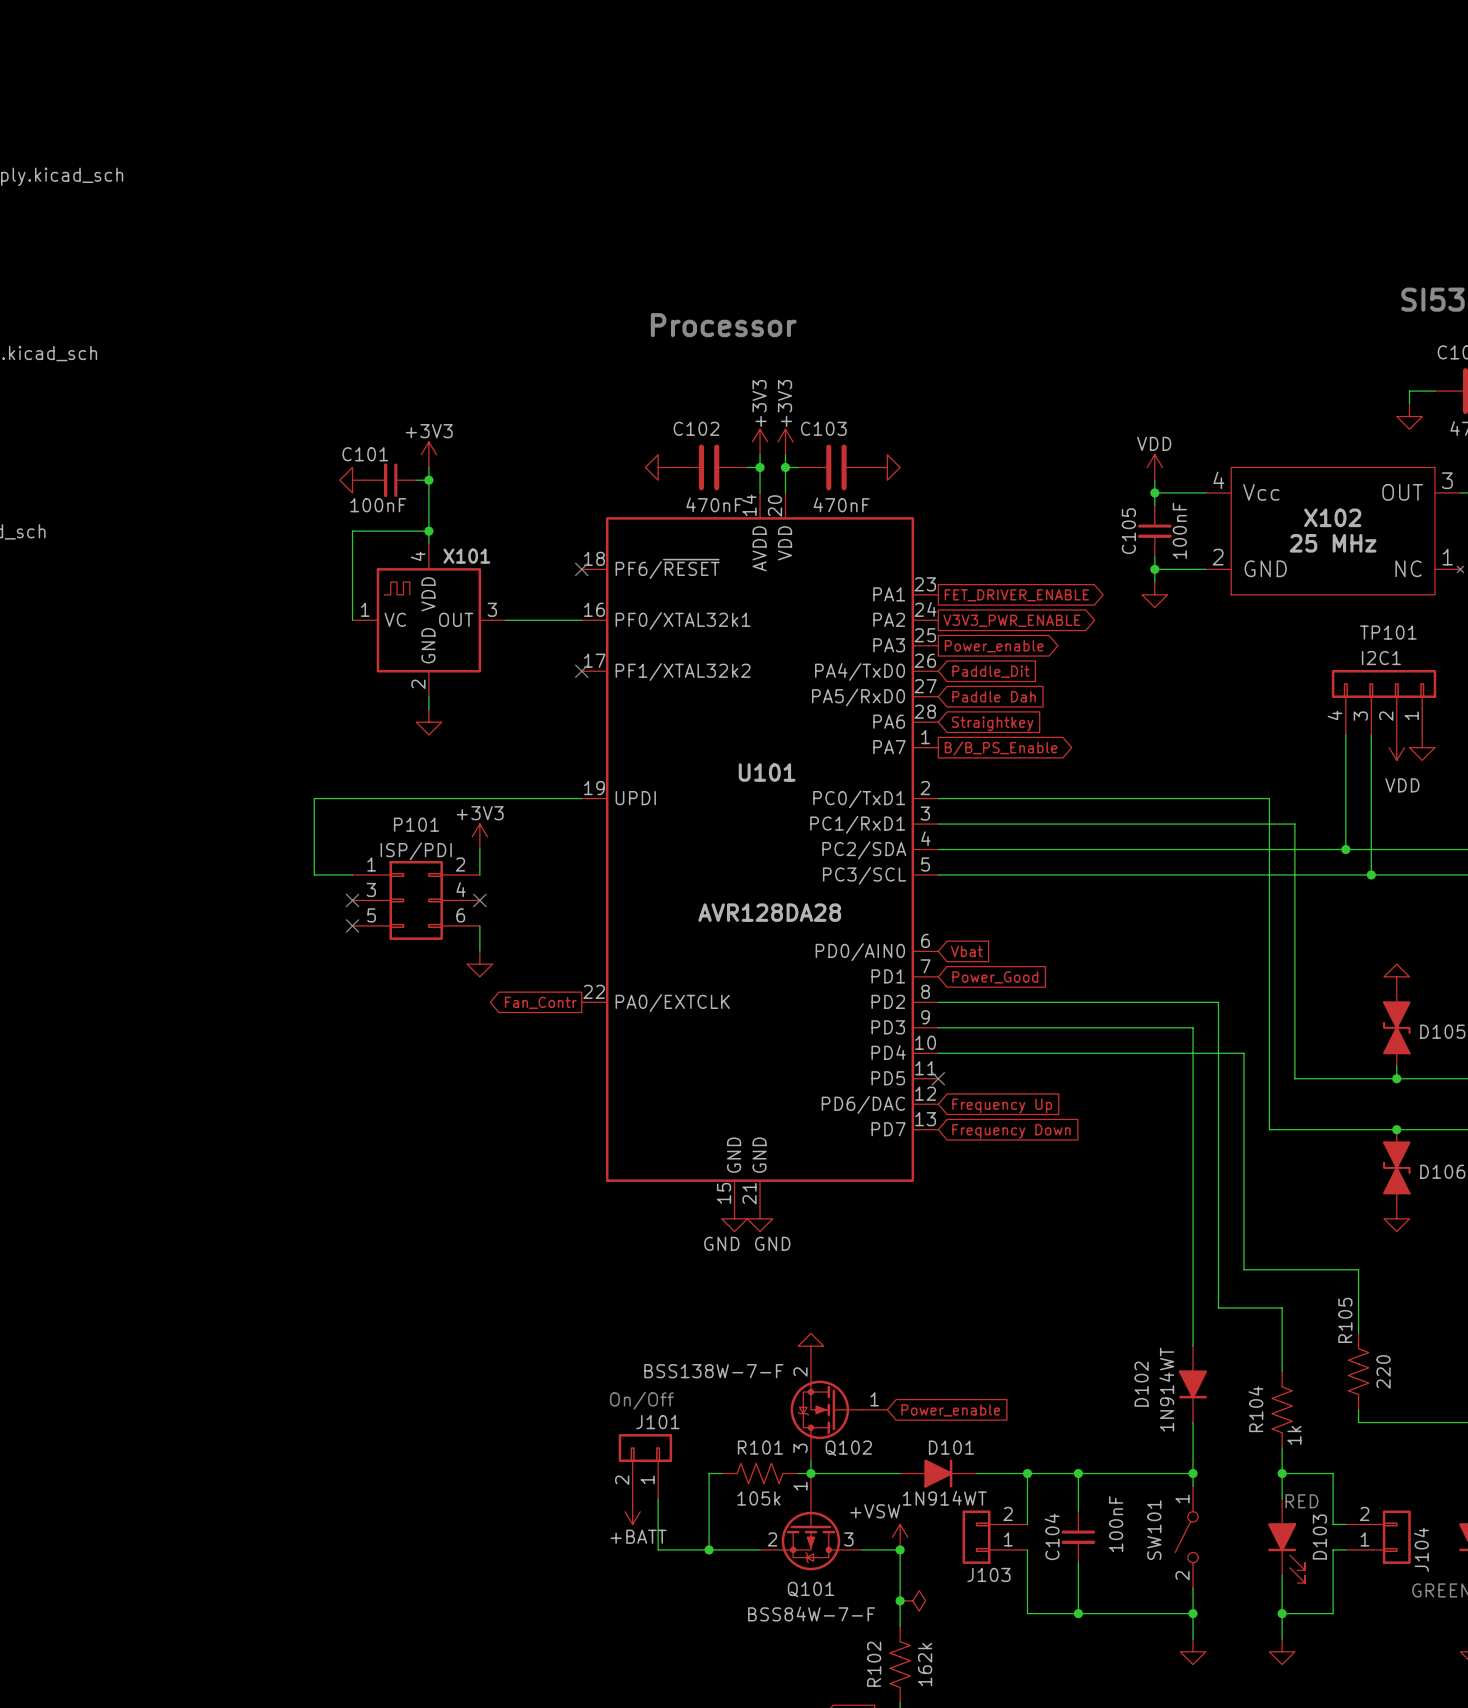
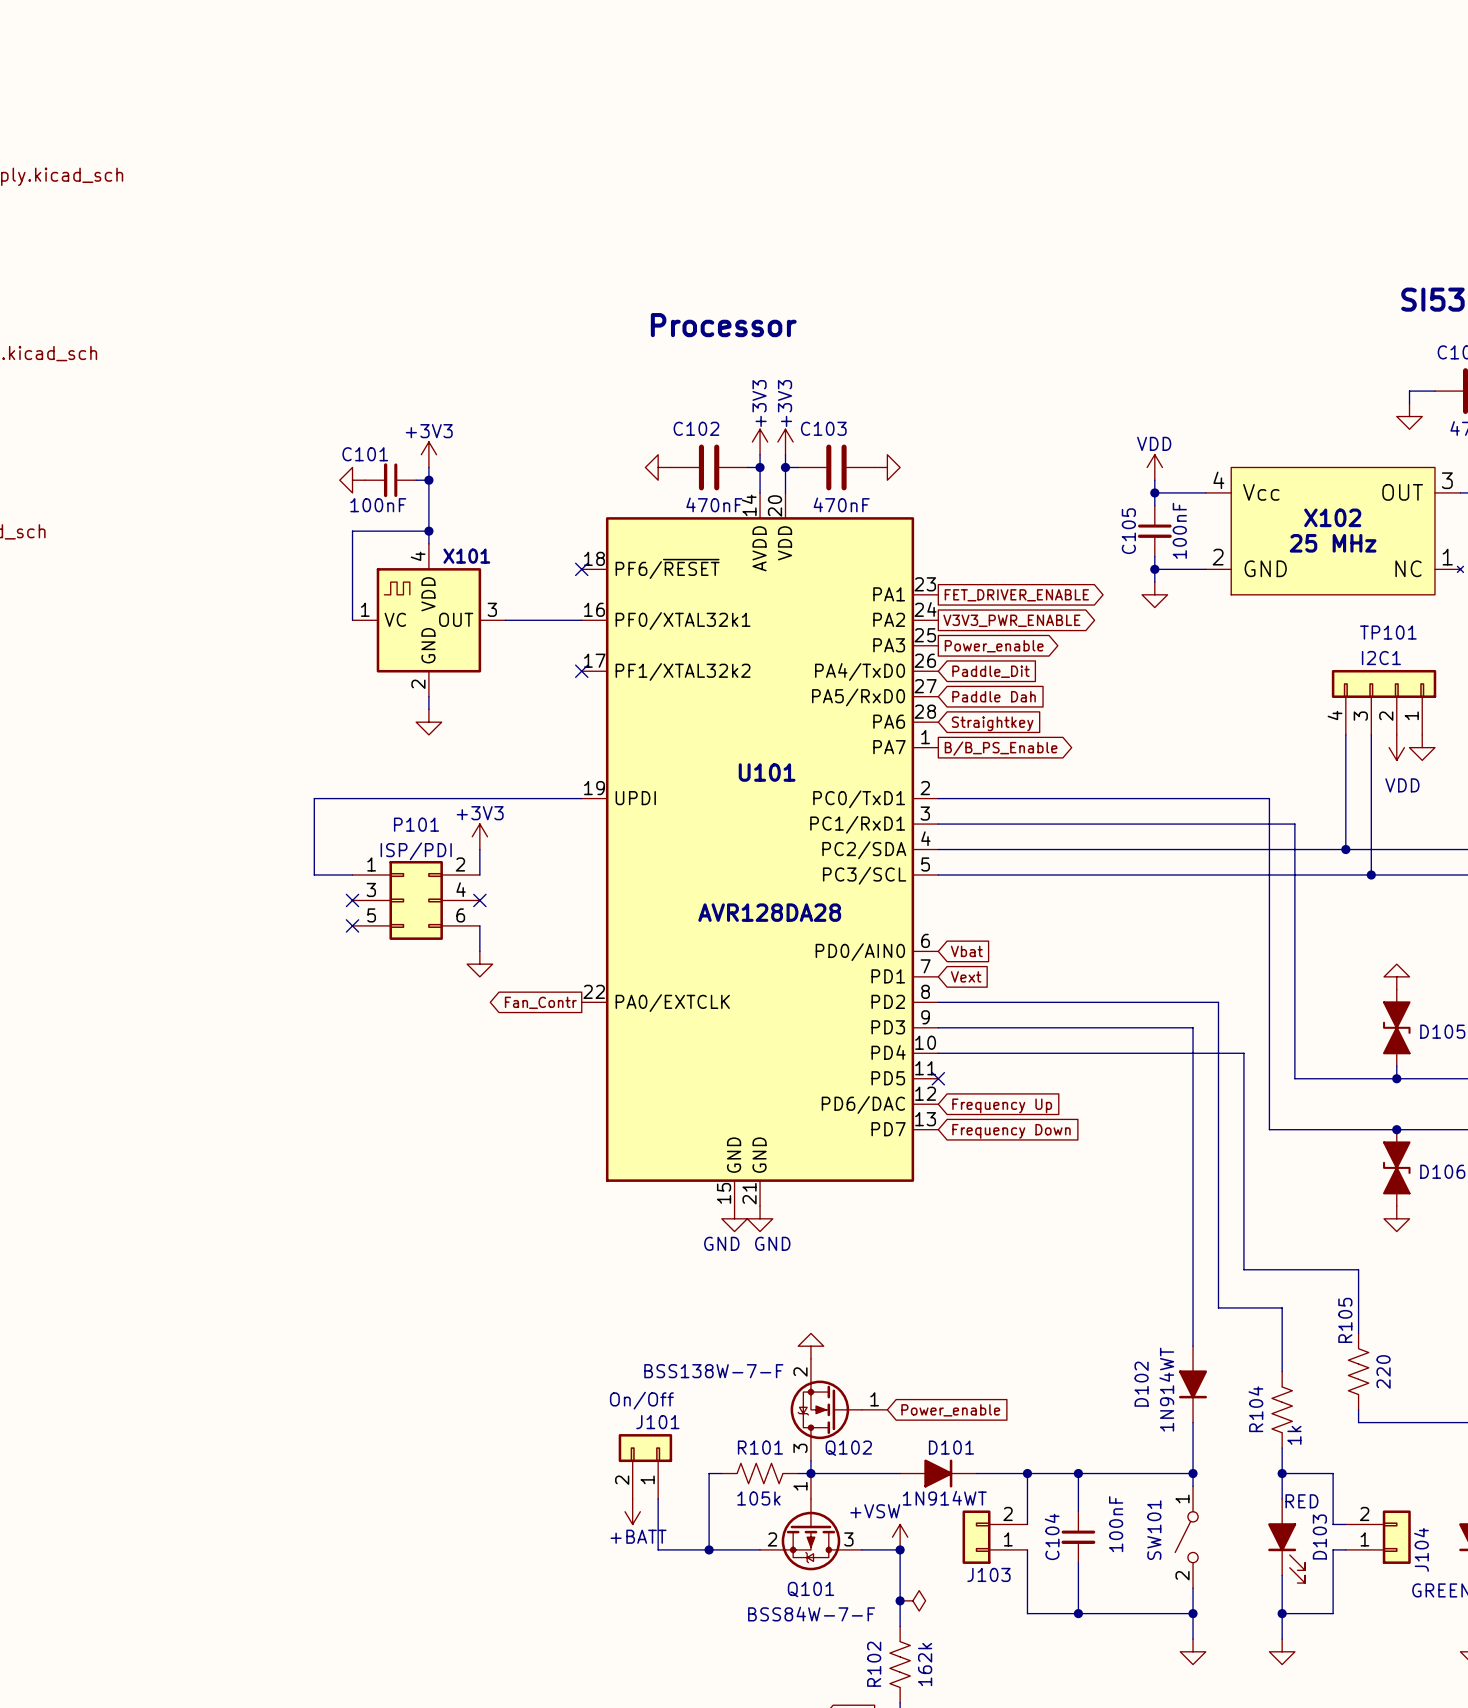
global label: Power_Good (995, 977) -> Vext (966, 976)

